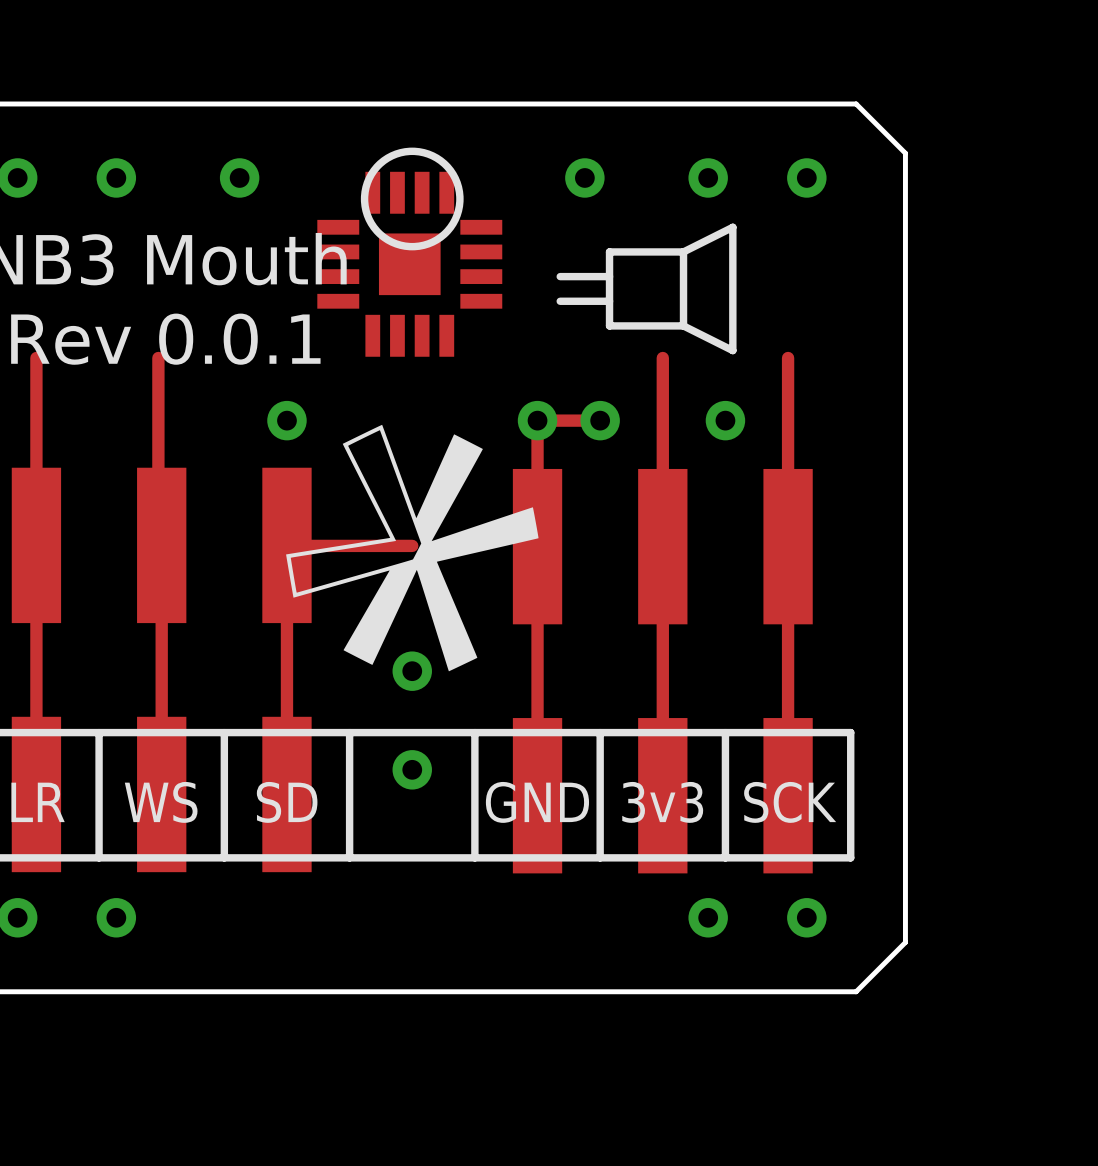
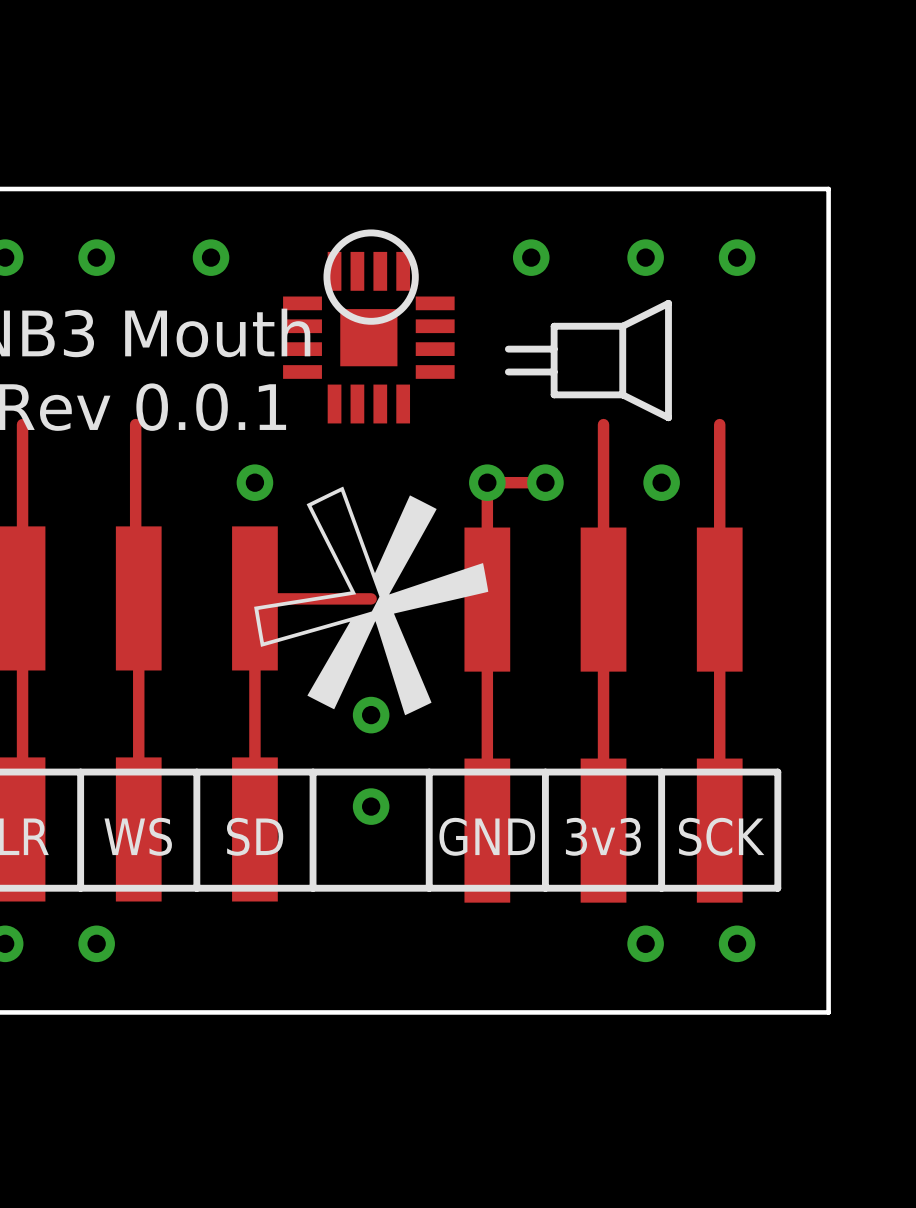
board edge: (856, 103) (905, 153) -> (782, 189) (828, 189) (828, 234)
board edge: (905, 942) (856, 991) -> (828, 966) (828, 1012) (782, 1012)

